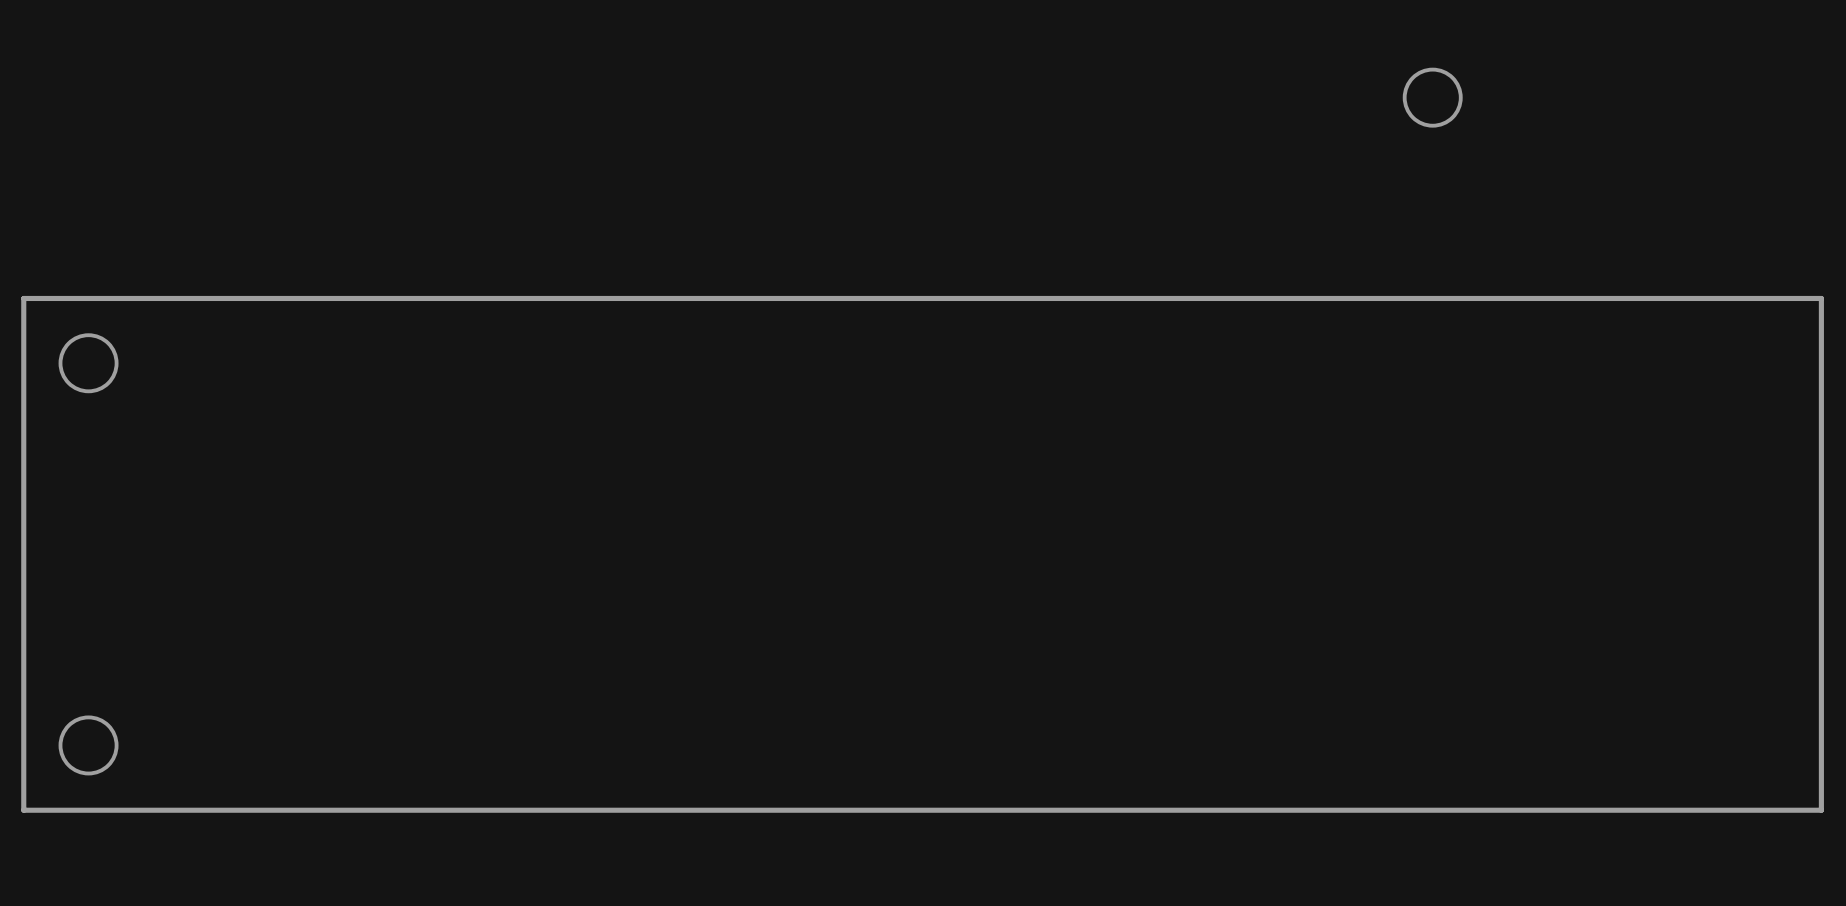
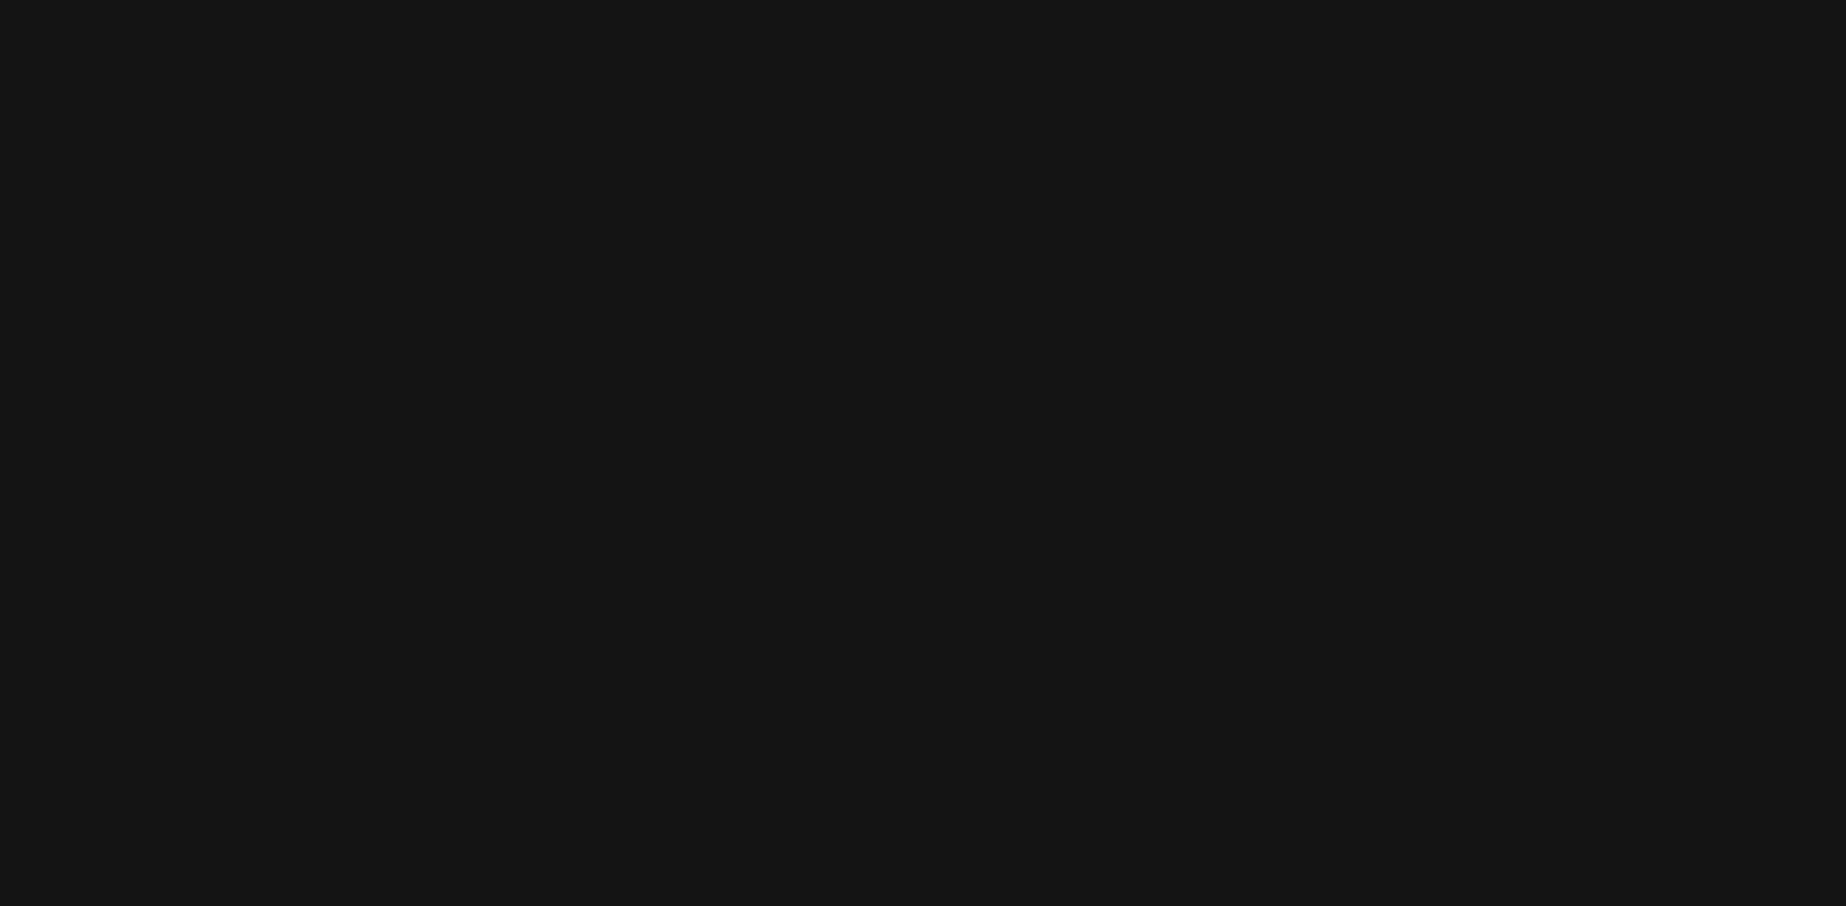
round board edge: [1402, 67, 1463, 128] -> none
board edge: (23, 298) (23, 810) (1821, 810) (1821, 298) (23, 298) -> none
round board edge: [58, 333, 119, 394] -> none
round board edge: [58, 715, 119, 776] -> none

